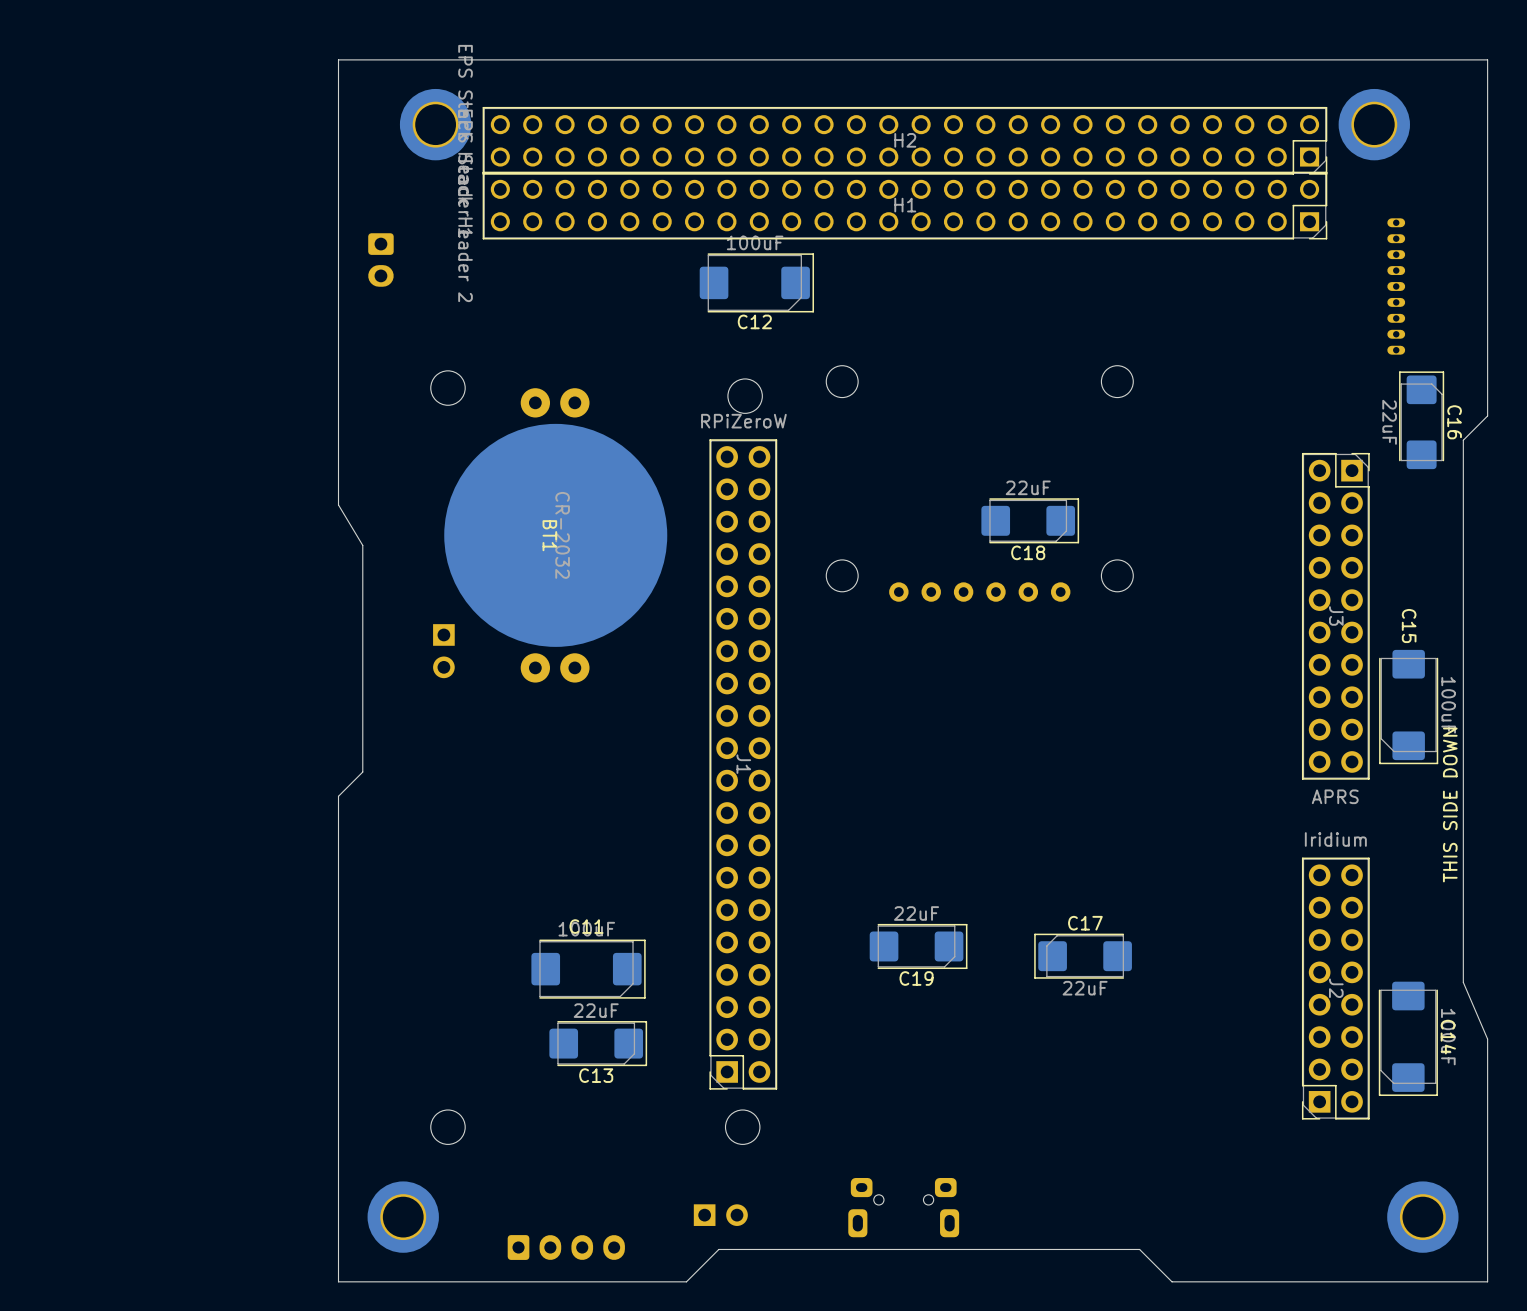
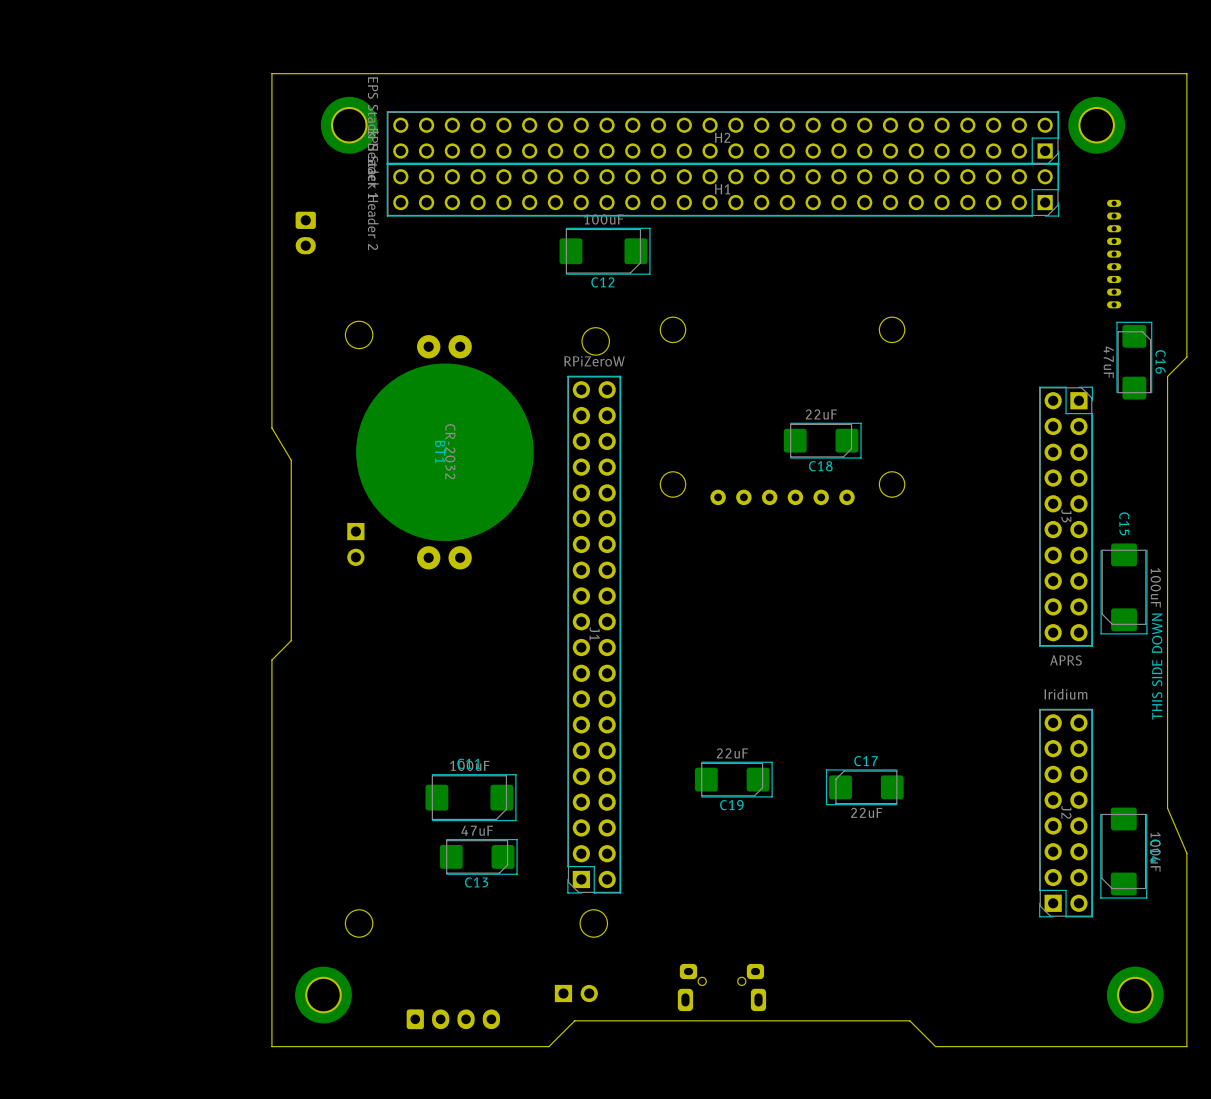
C16 value: 22uF (1389, 422) -> 47uF (1108, 362)
C13 value: 22uF (596, 1010) -> 47uF (477, 830)

